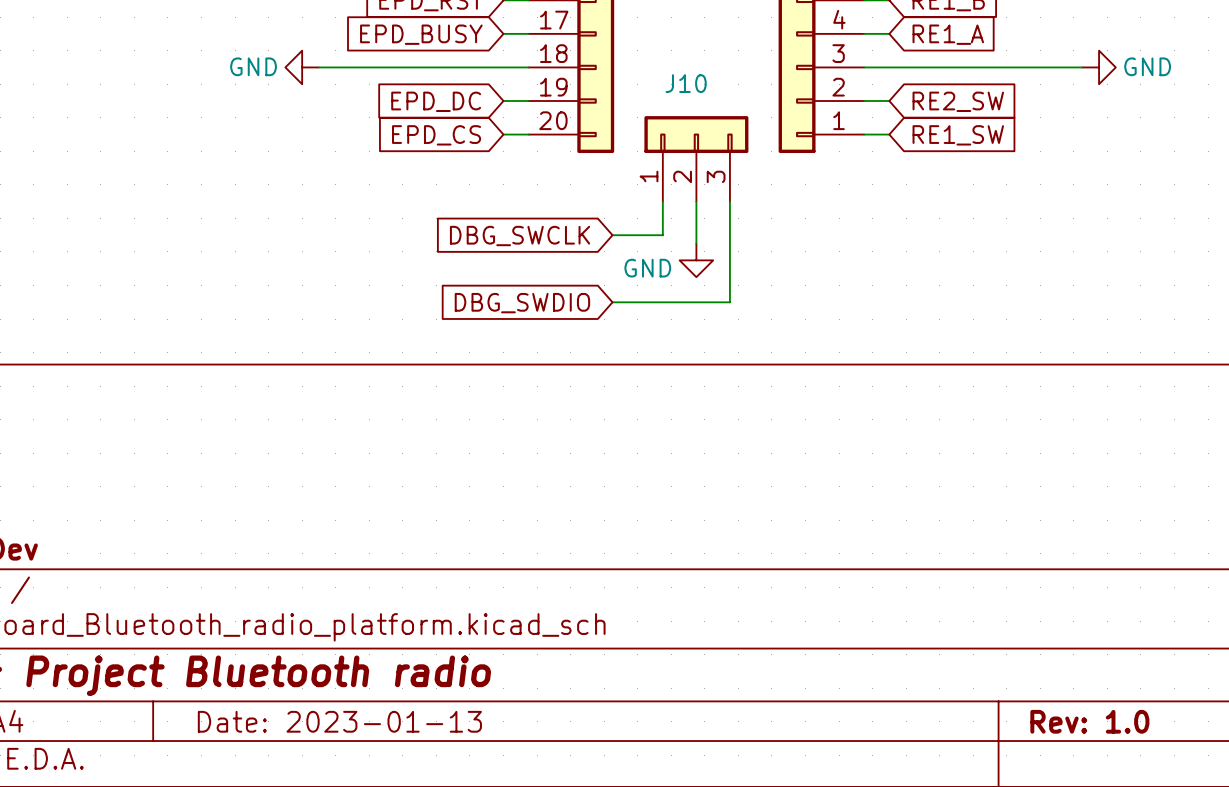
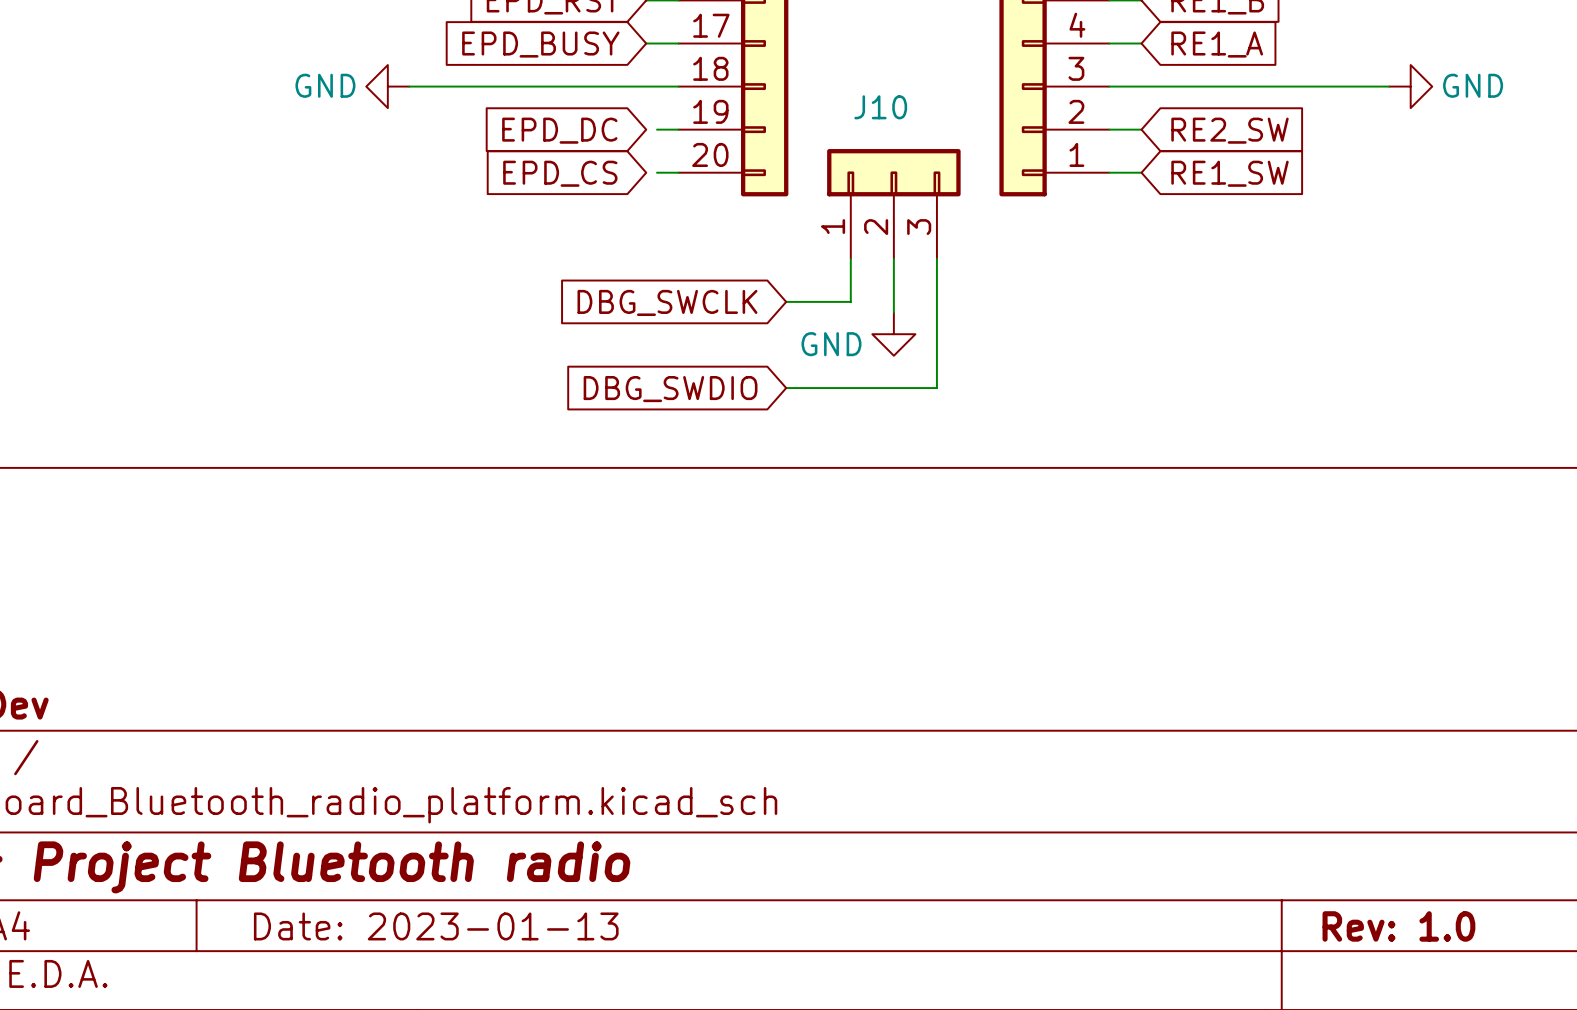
wire: (503, 101) (511, 101) -> none
wire: (503, 134) (511, 134) -> none

